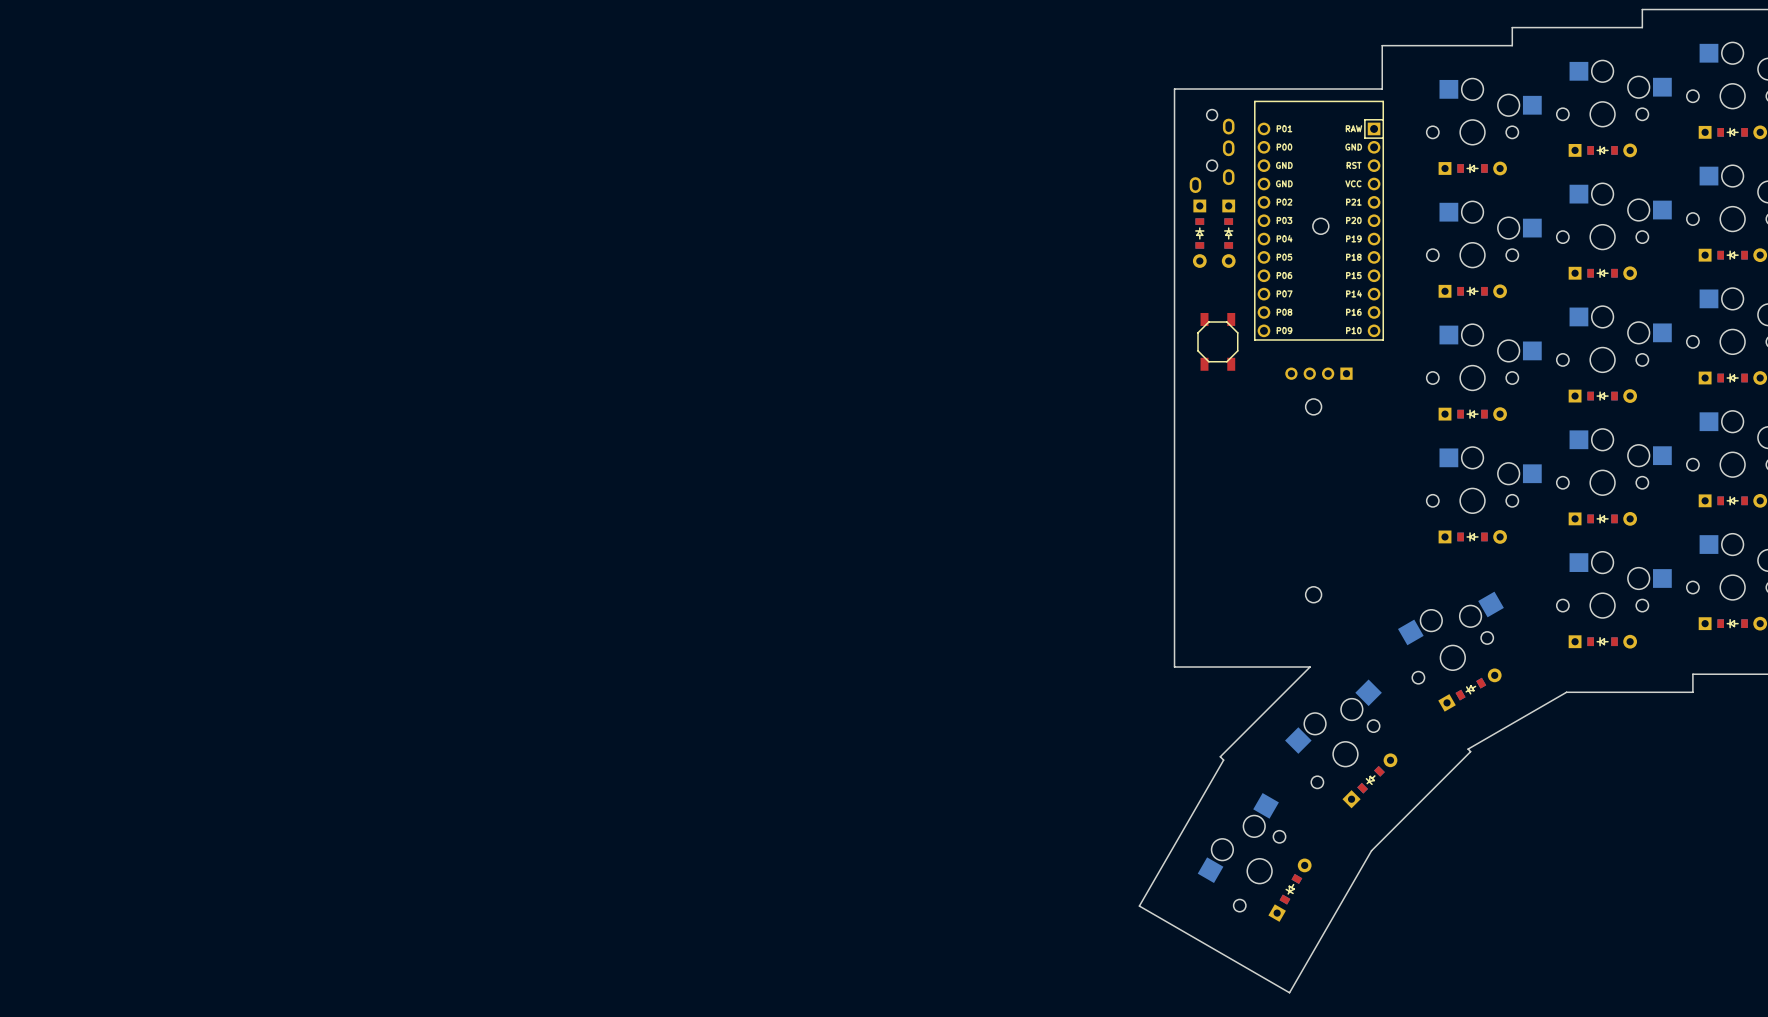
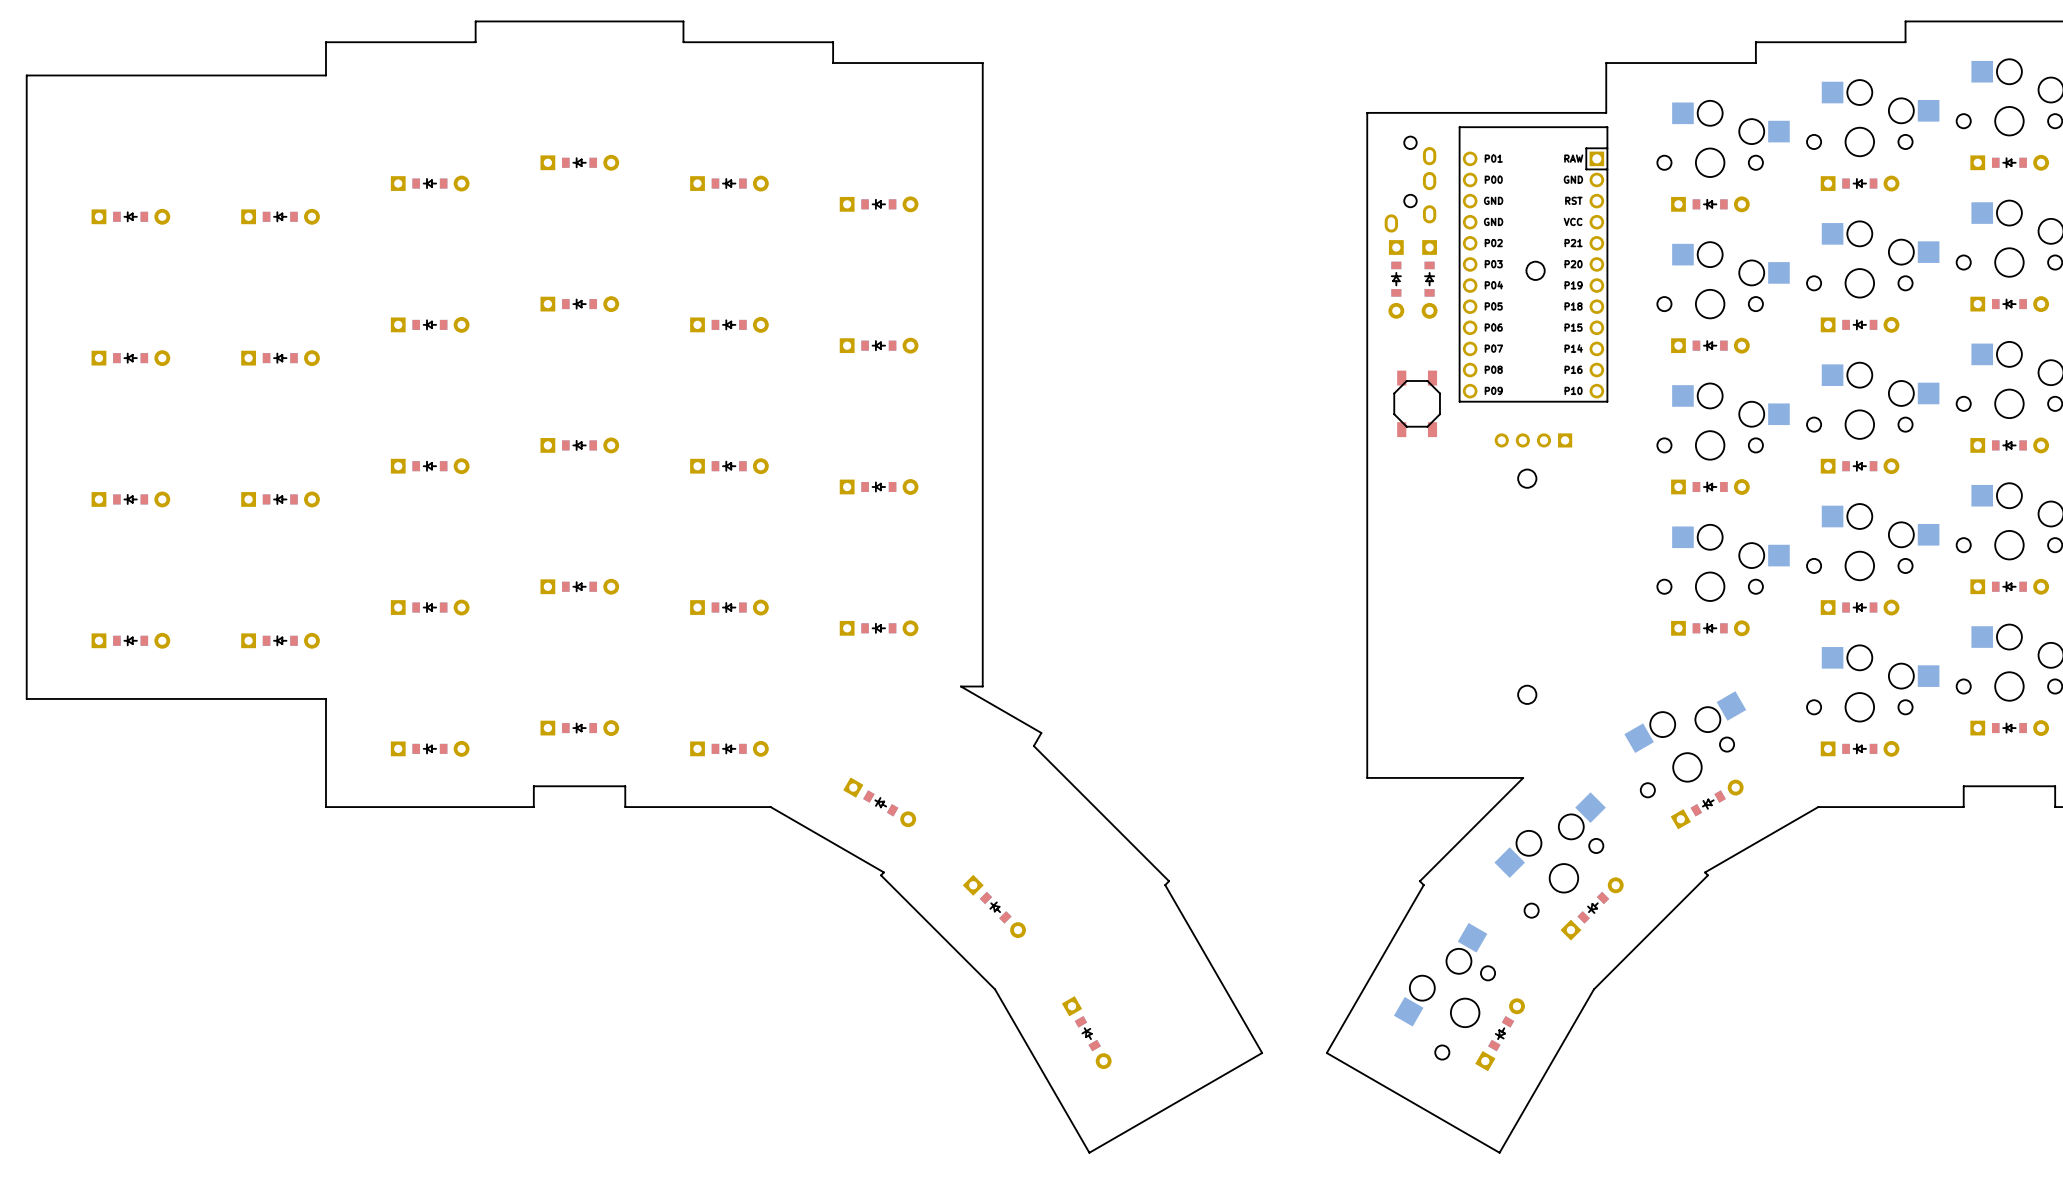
board edge: none -> (475, 21) (683, 21) (683, 42) (833, 42) (833, 63) (982, 63) (982, 686) (960, 686) (1041, 732) (1033, 746) (1169, 881) (1165, 885) (1262, 1053) (1089, 1152) (995, 989) (881, 875) (883, 872) (770, 807) (625, 807) (625, 786) (533, 786) (533, 807) (325, 807) (325, 698) (26, 698) (26, 75) (325, 75) (325, 42) (475, 42) (475, 21)
part: none -> (579, 162)
part: none -> (430, 183)
part: none -> (729, 183)
part: none -> (879, 204)
part: none -> (130, 216)
part: none -> (280, 216)
part: none -> (579, 304)
part: none -> (430, 324)
part: none -> (729, 324)
part: none -> (879, 345)
part: none -> (130, 358)
part: none -> (280, 358)
part: none -> (579, 445)
part: none -> (430, 466)
part: none -> (729, 466)
part: none -> (879, 486)
part: none -> (130, 499)
part: none -> (280, 499)
part: none -> (579, 586)
part: none -> (430, 607)
part: none -> (729, 607)
part: none -> (879, 628)
part: none -> (130, 640)
part: none -> (280, 640)
part: none -> (579, 728)
part: none -> (430, 748)
part: none -> (729, 748)
part: none -> (879, 802)
part: none -> (994, 906)
part: none -> (1086, 1032)

